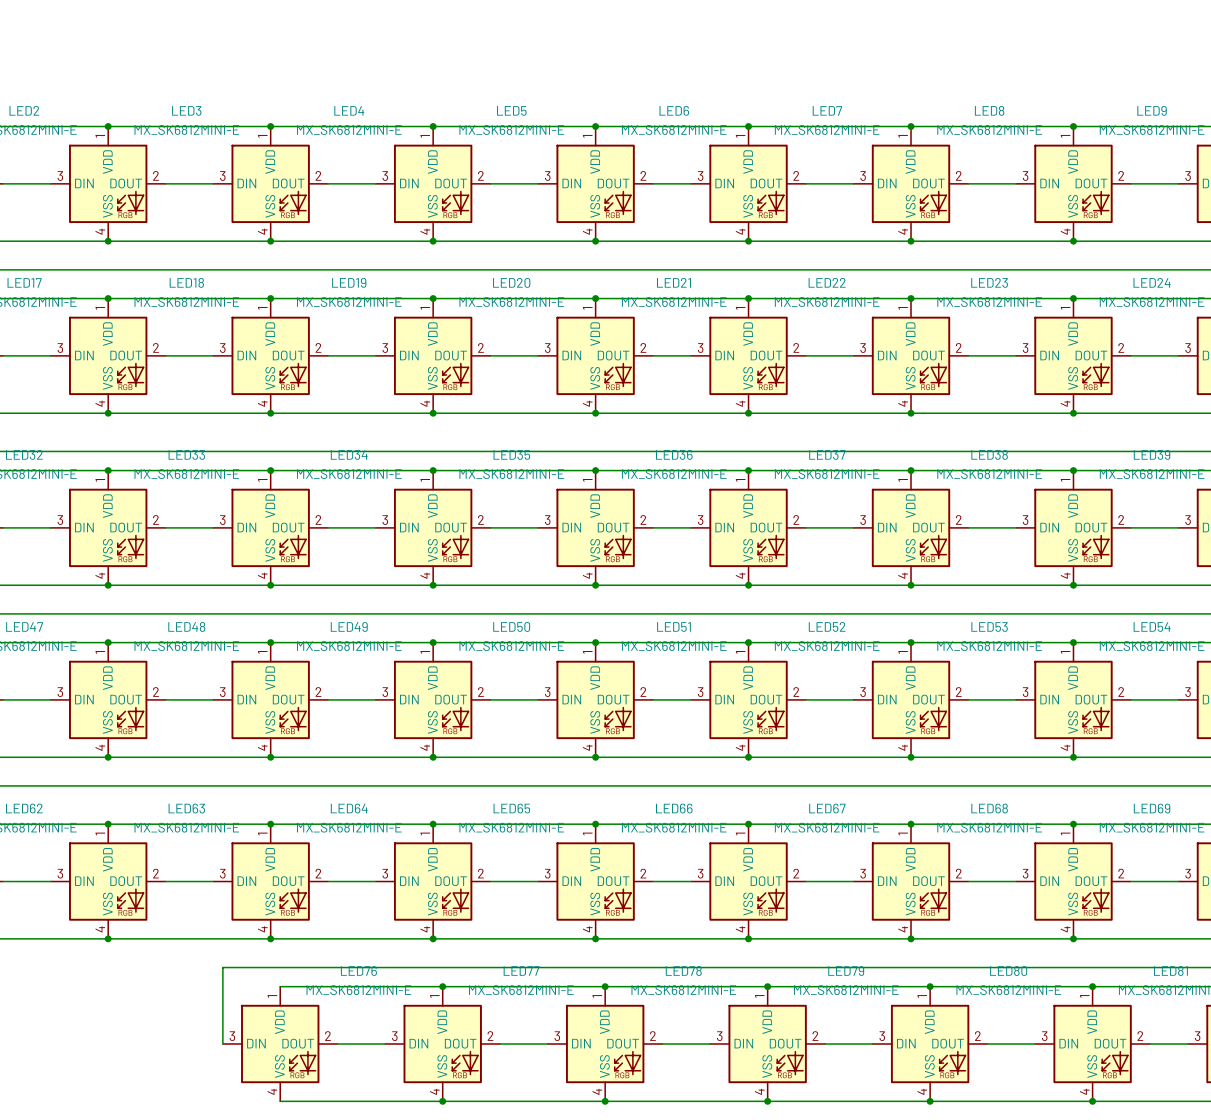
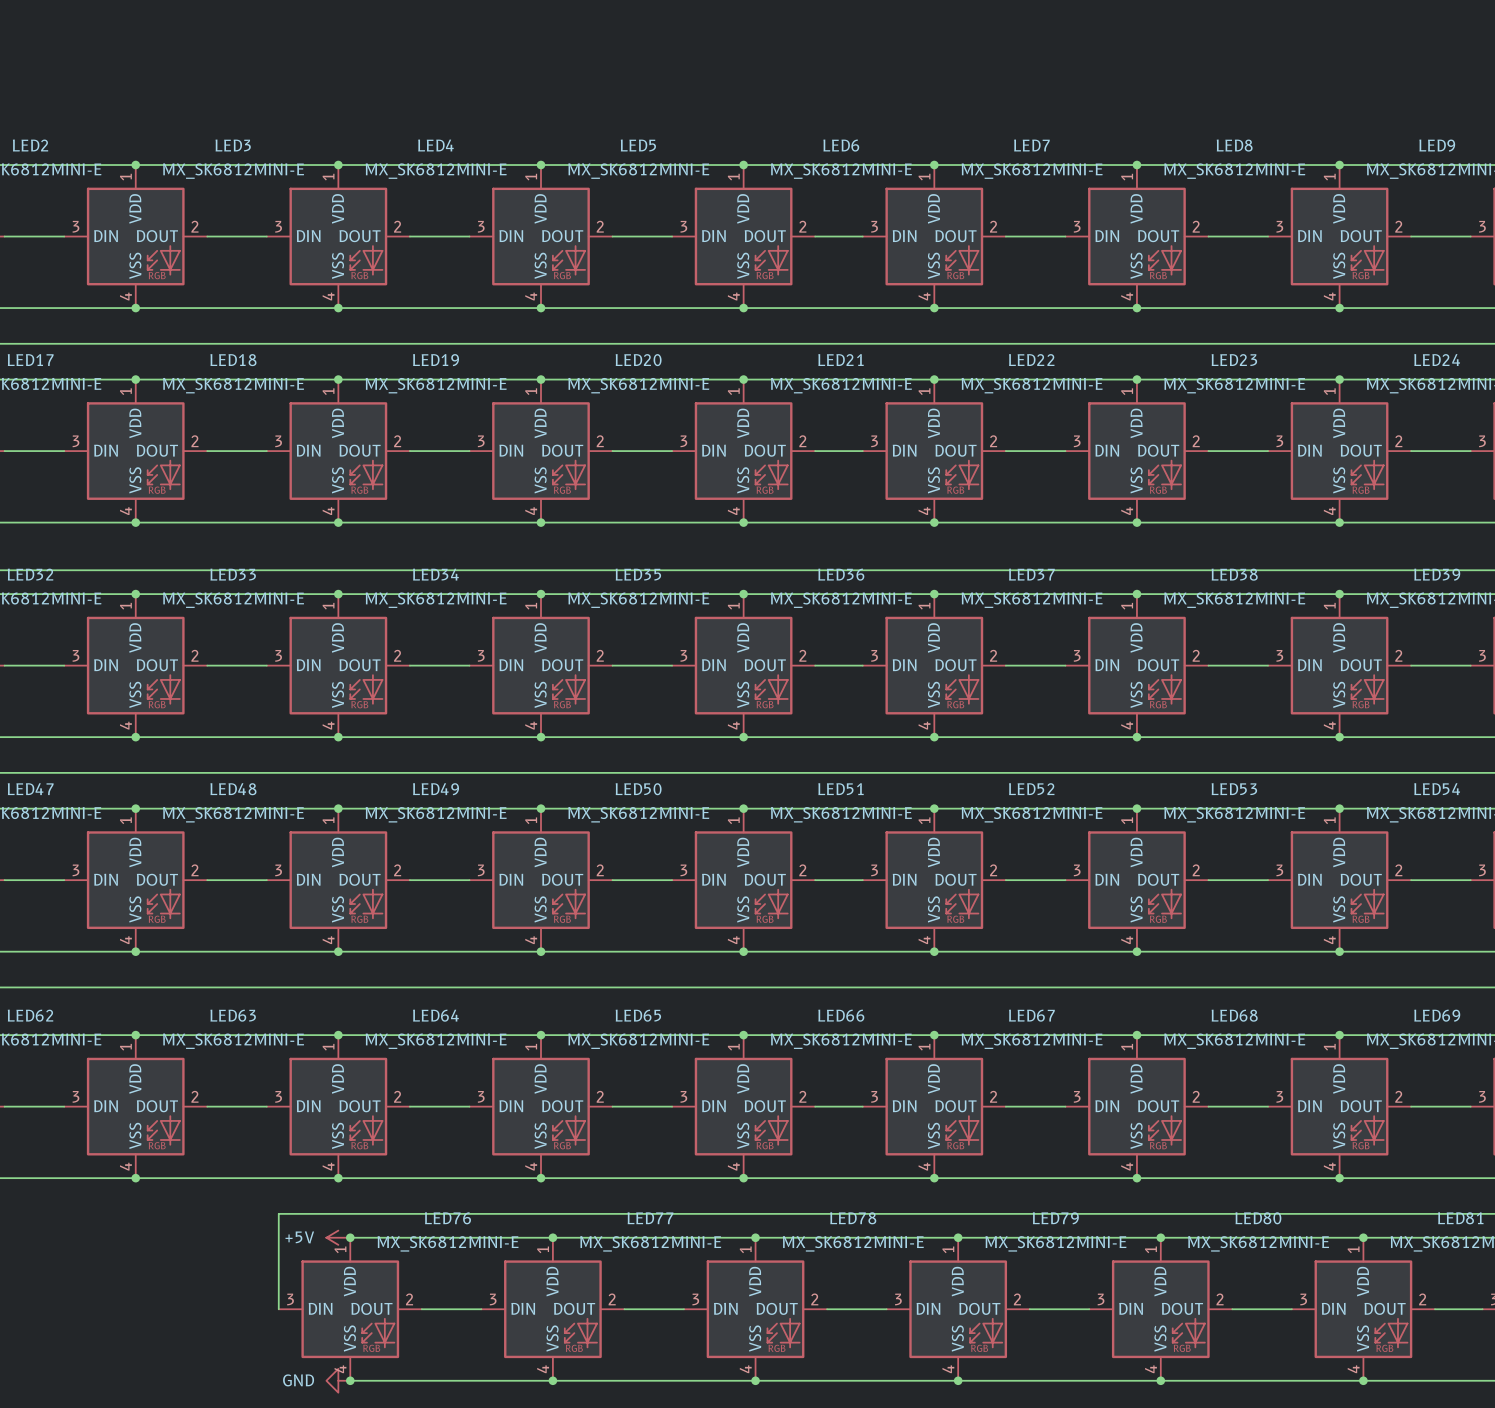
power symbol: none -> +5V (338, 1237)
junction: none -> (350, 1237)
power symbol: none -> GND (338, 1380)
junction: none -> (350, 1380)

